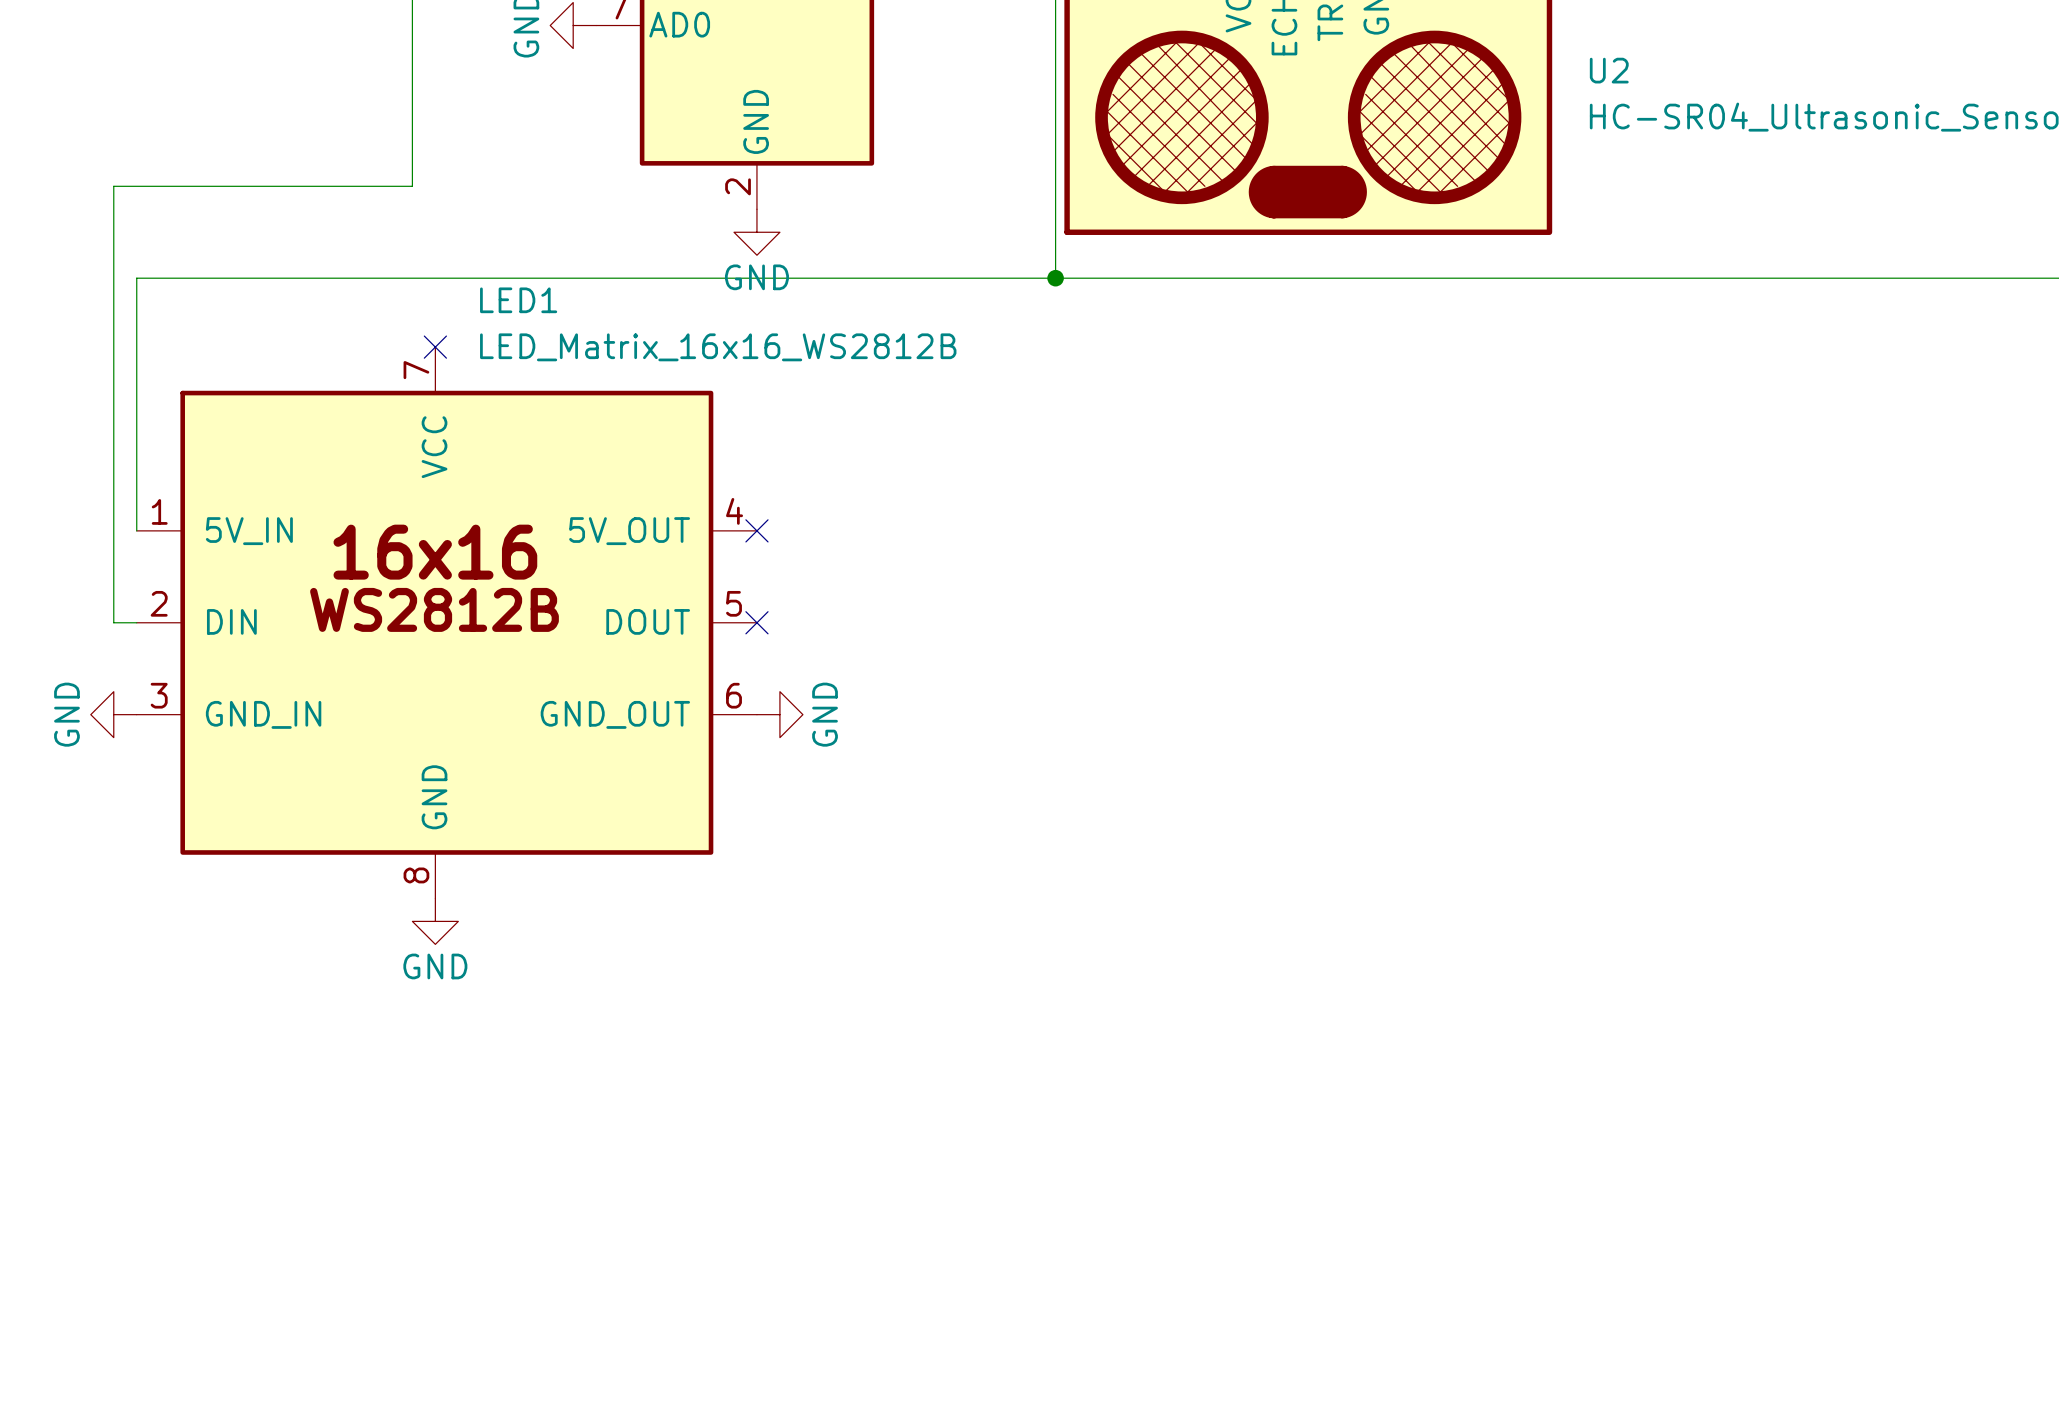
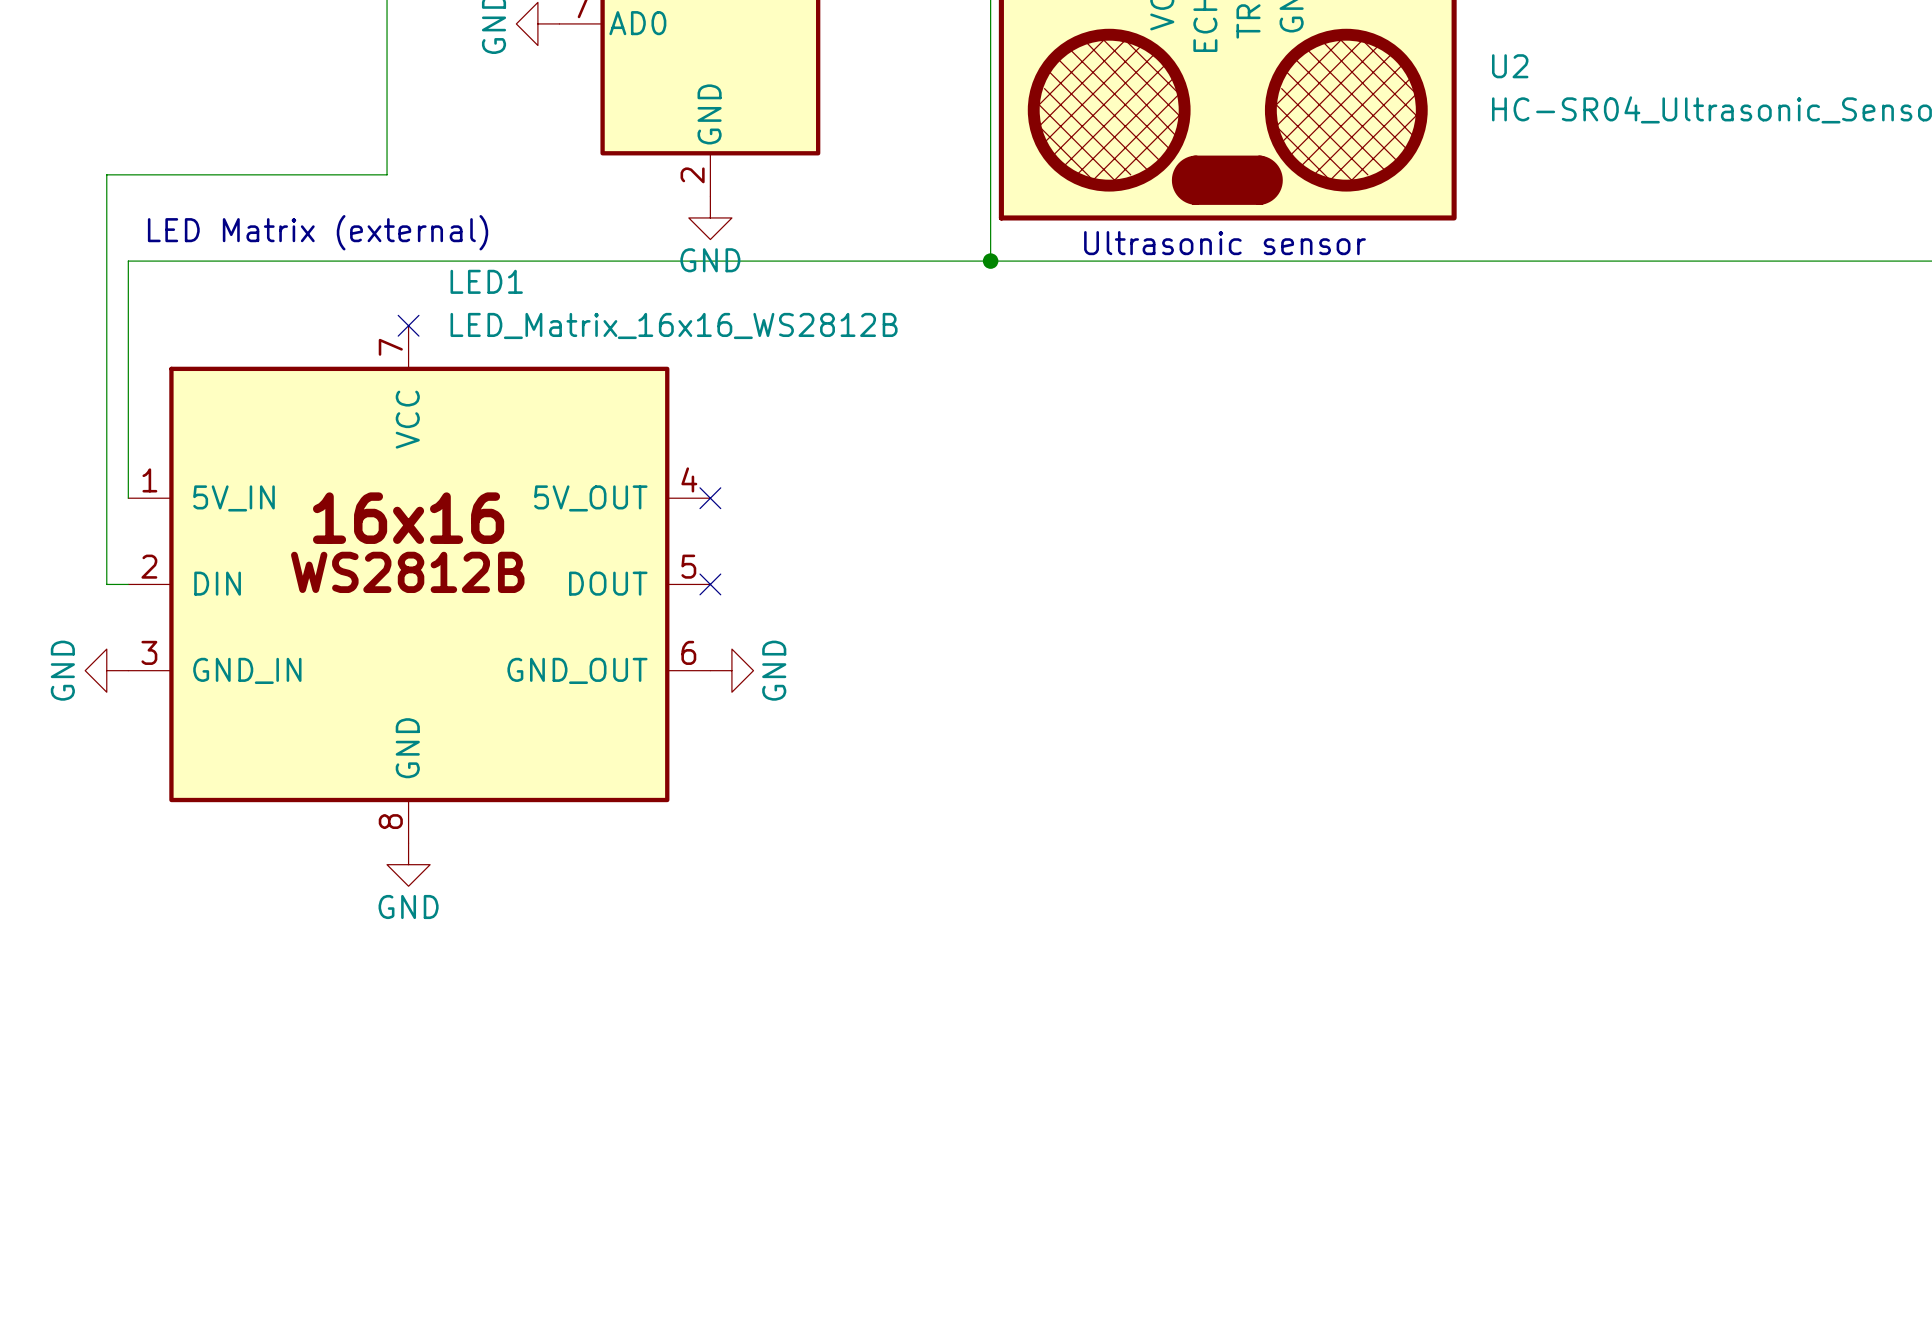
text: none -> LED Matrix (external) (318, 232)
text: none -> Ultrasonic sensor (1224, 243)

